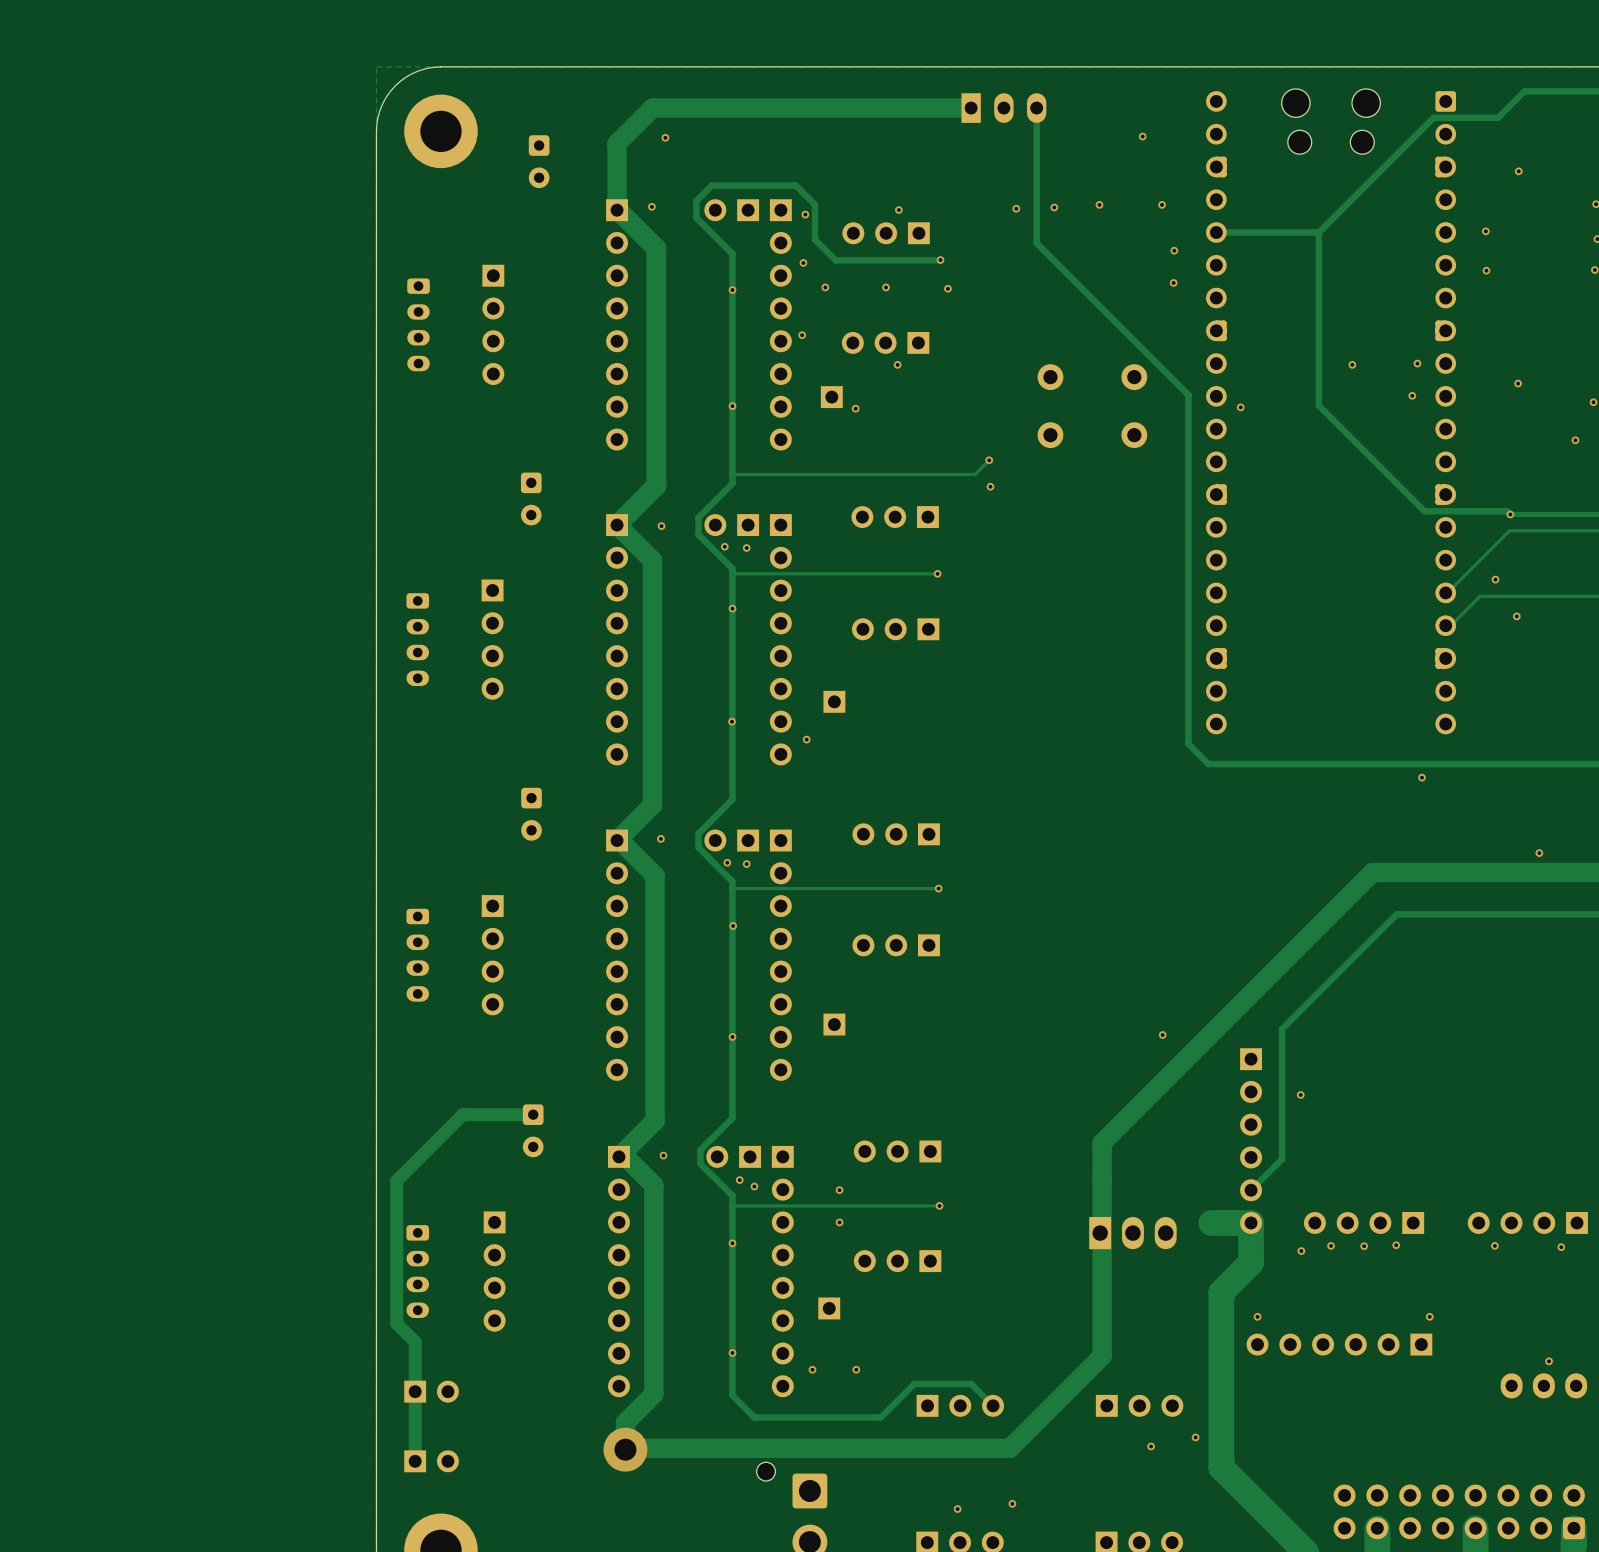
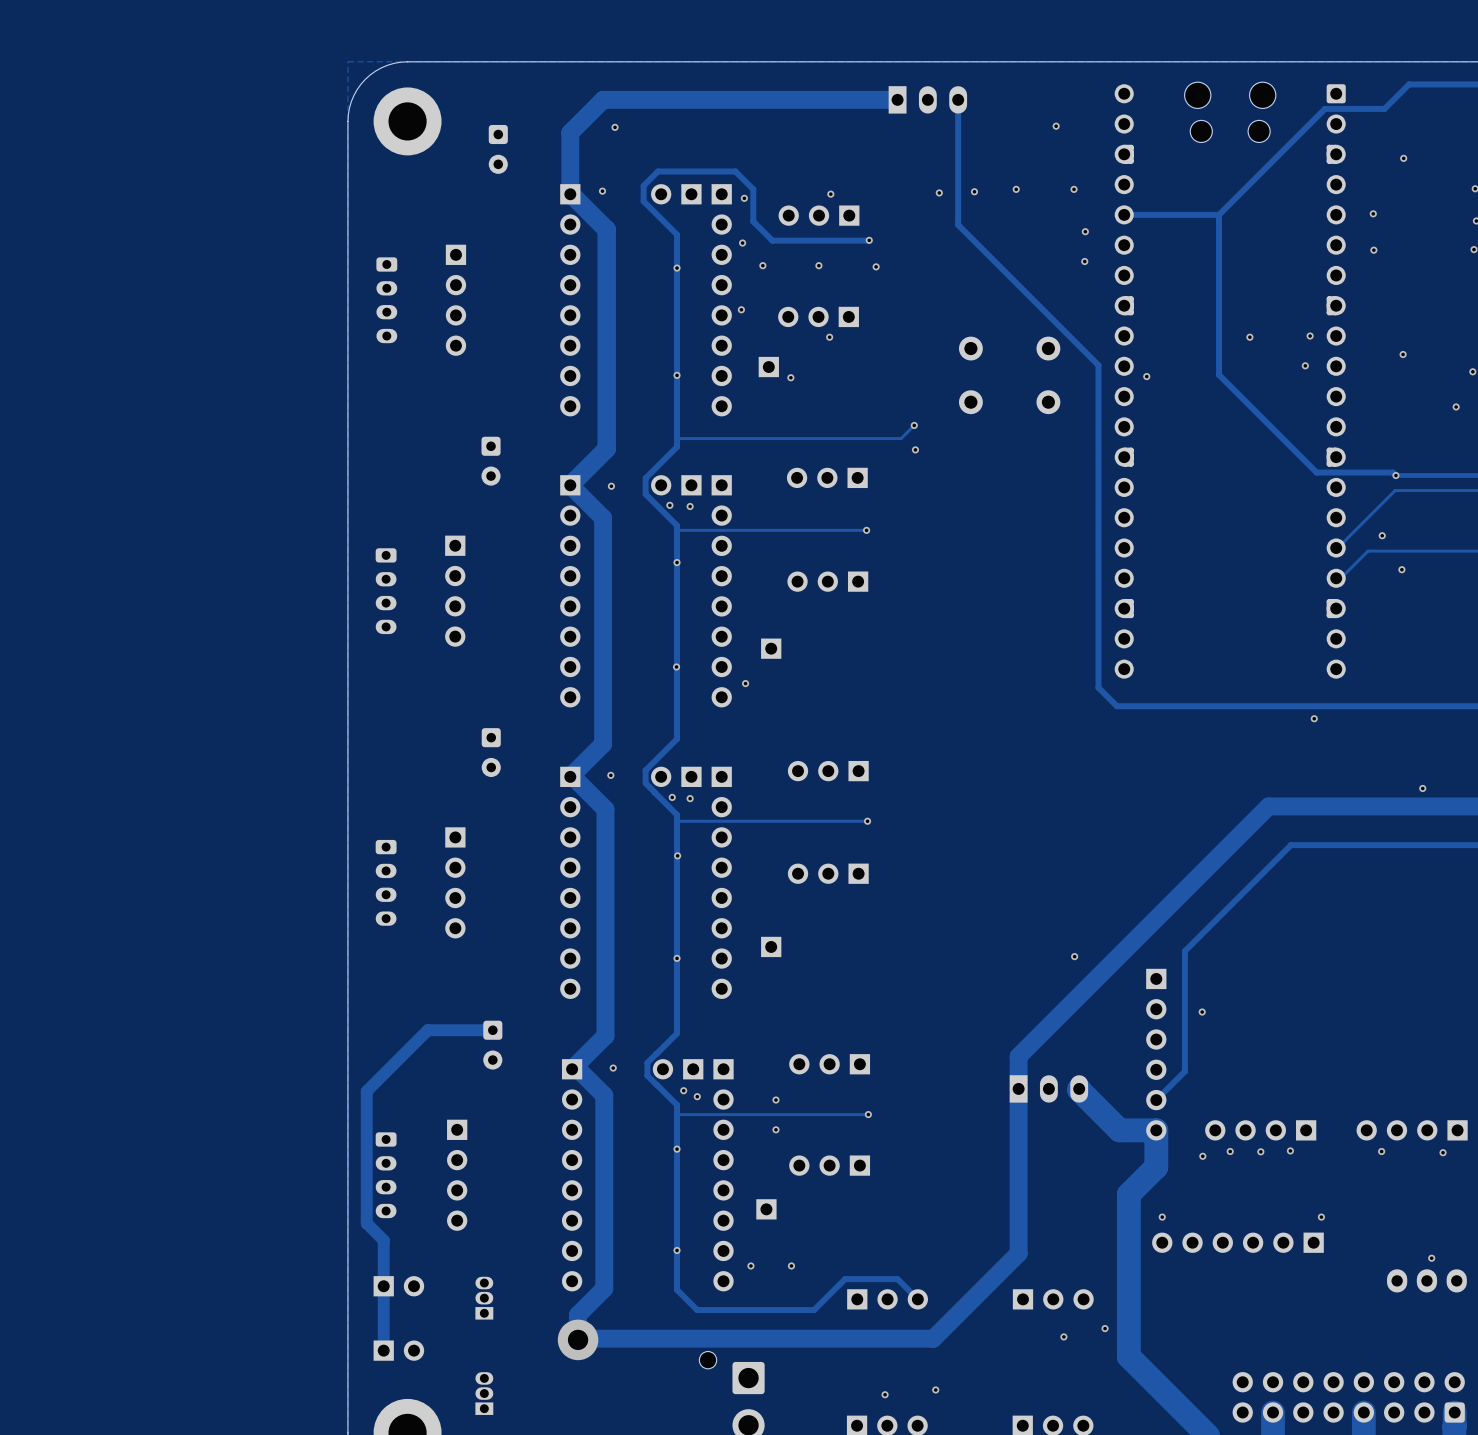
part: none -> (1048, 1088)
track: none -> (1079, 1088) (1119, 1130)
part: (1132, 1233) -> none
part: none -> (484, 1298)
part: none -> (484, 1393)

